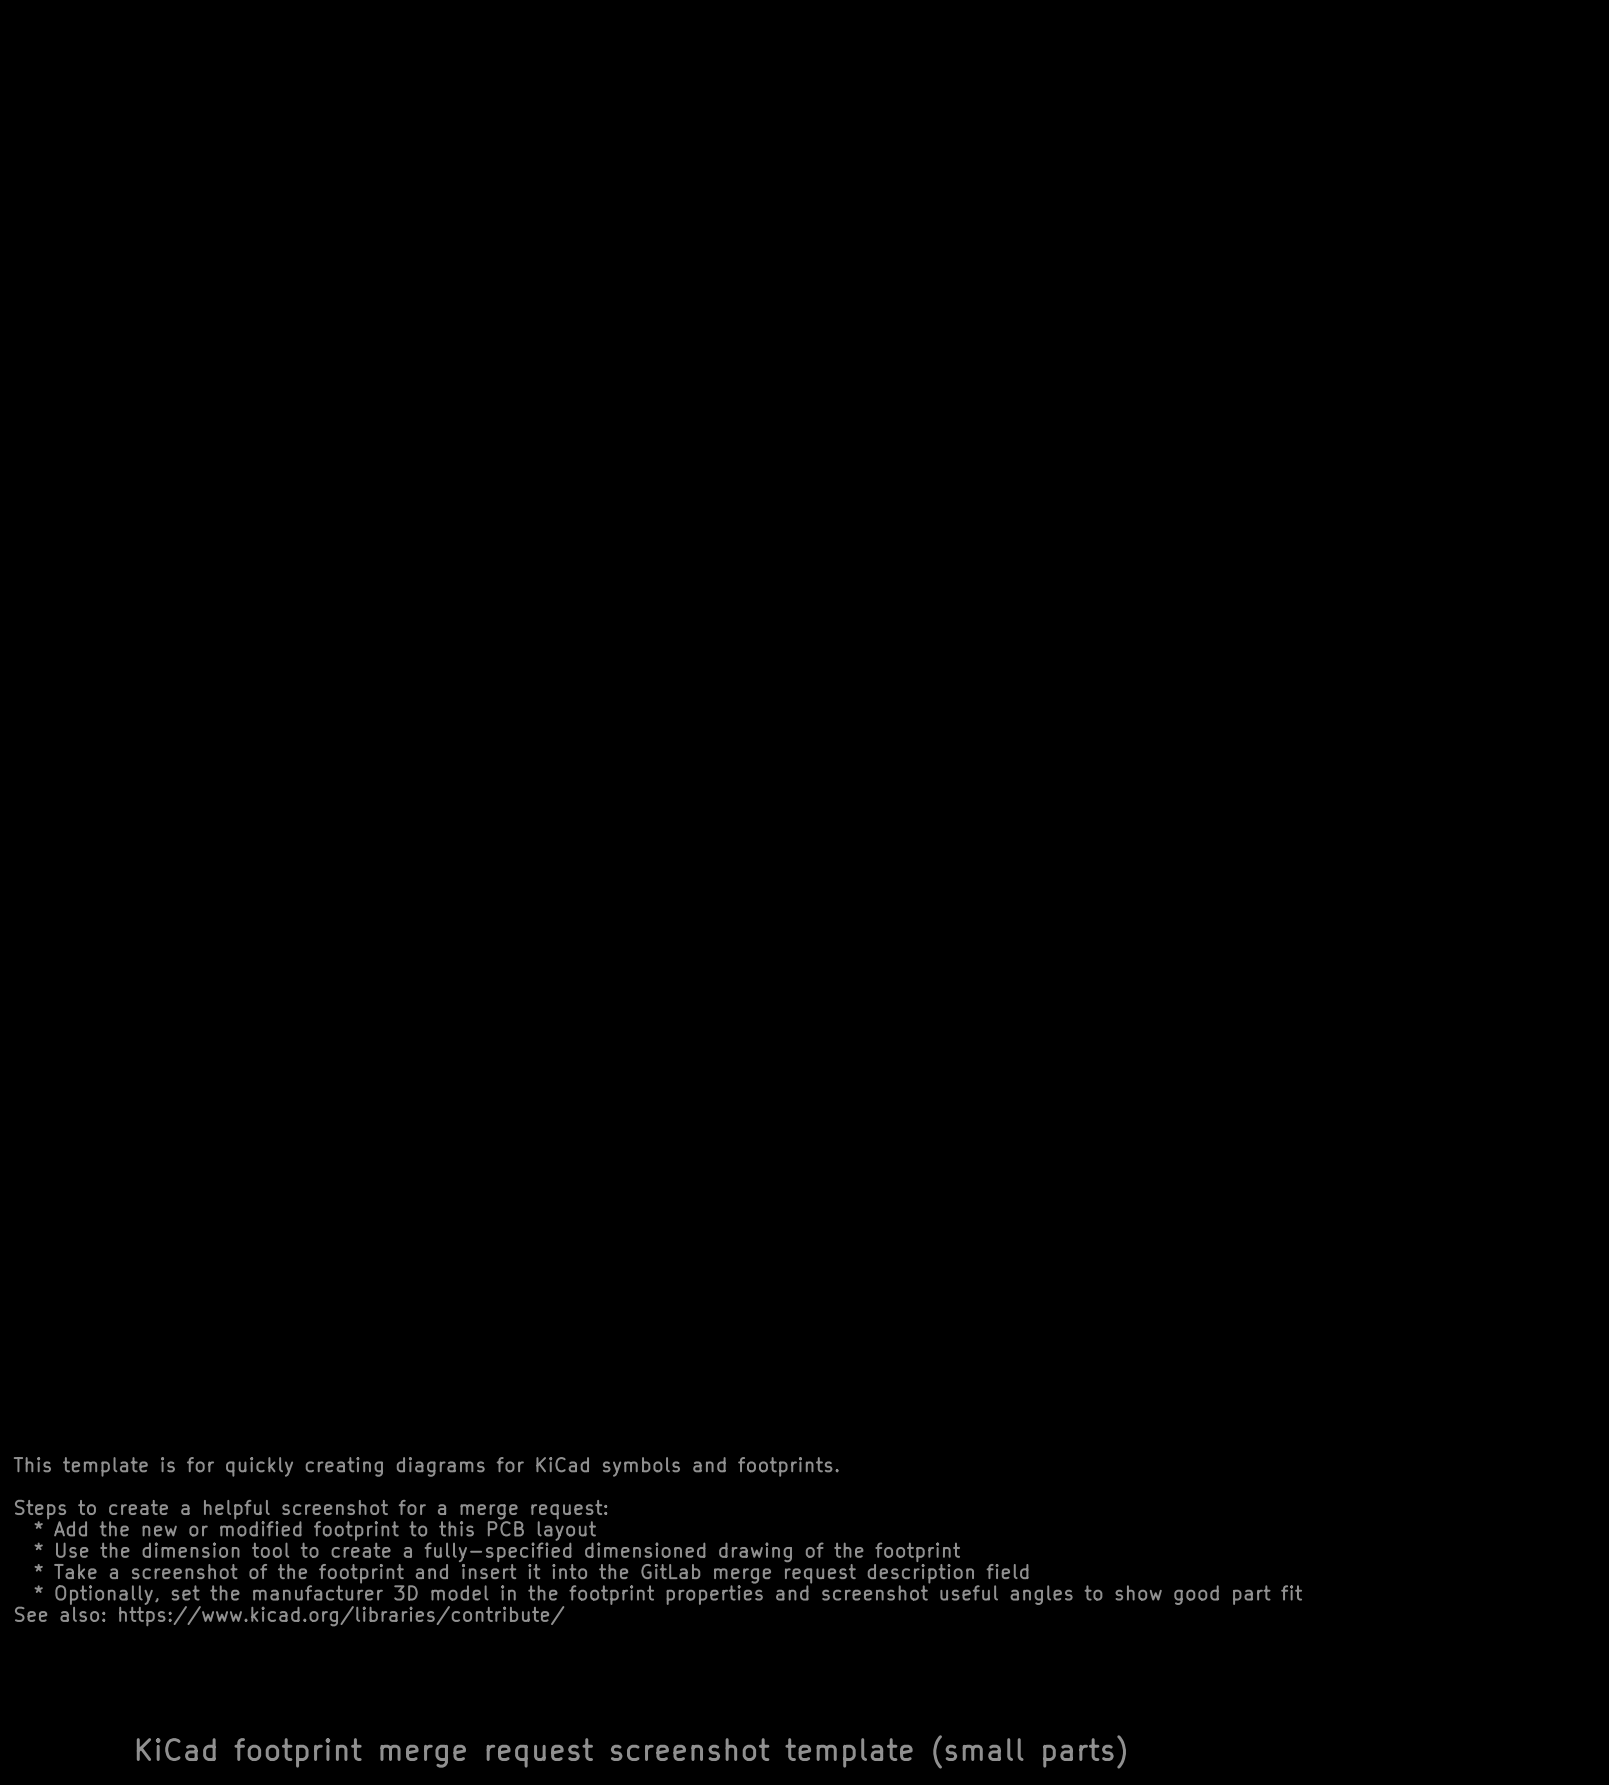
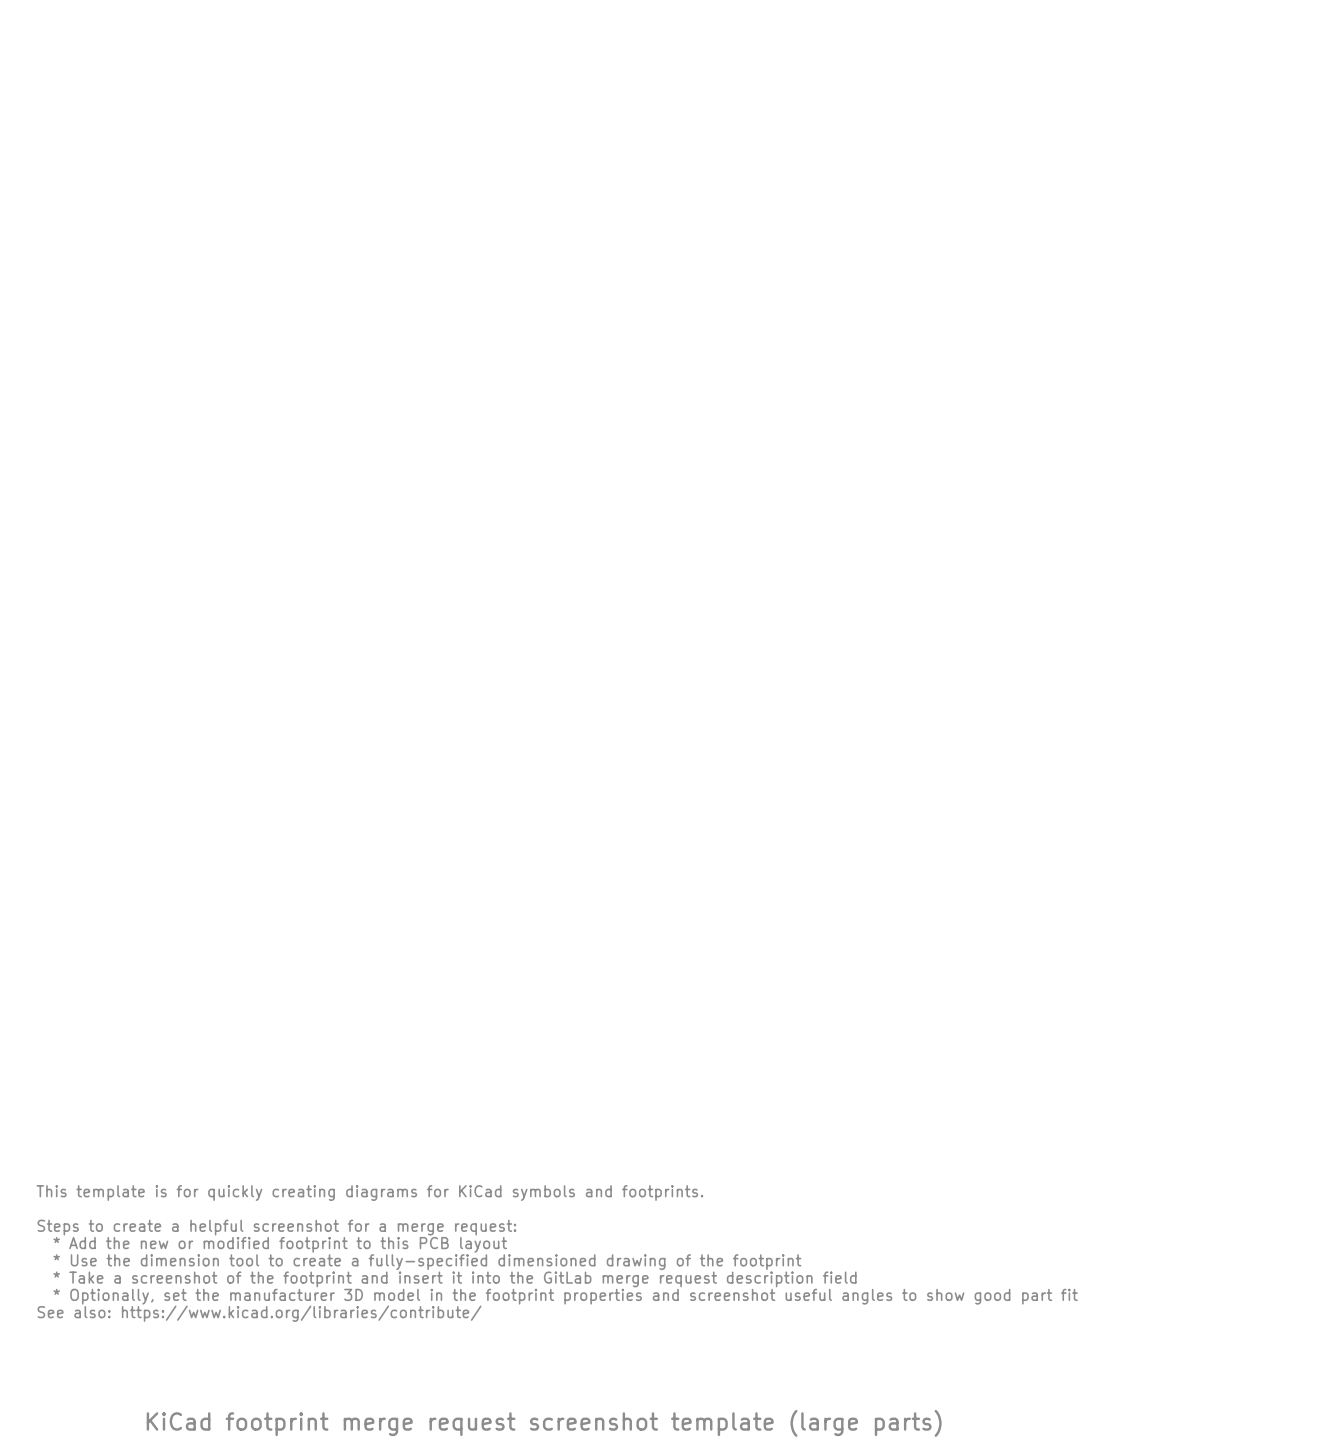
text: KiCad footprint merge request screenshot template (small parts) (631, 1751) -> KiCad footprint merge request screenshot template (large parts) (544, 1423)

